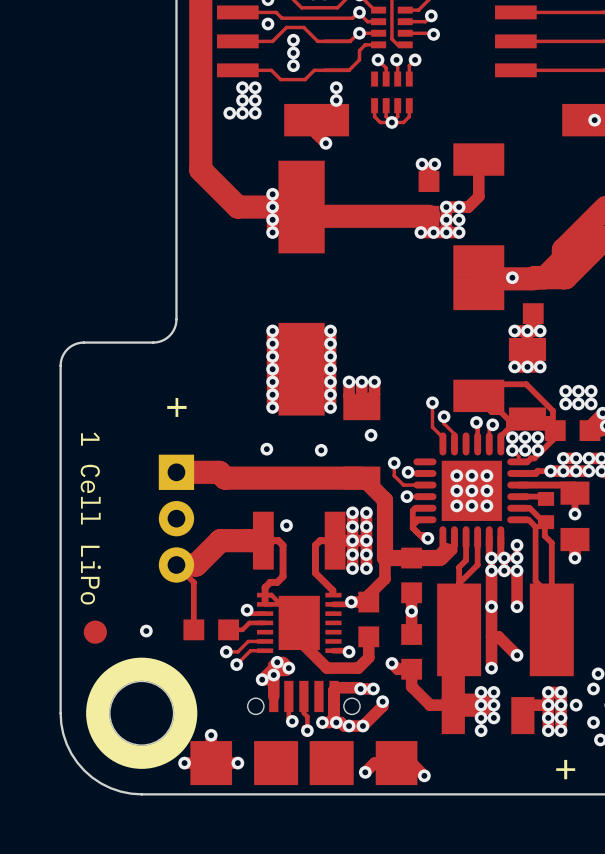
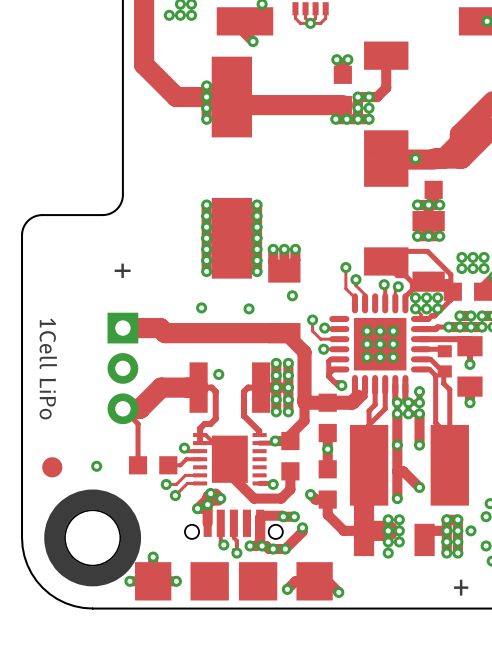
text: 1 Cell LiPo (90, 518) -> 1Cell LiPo (48, 368)

